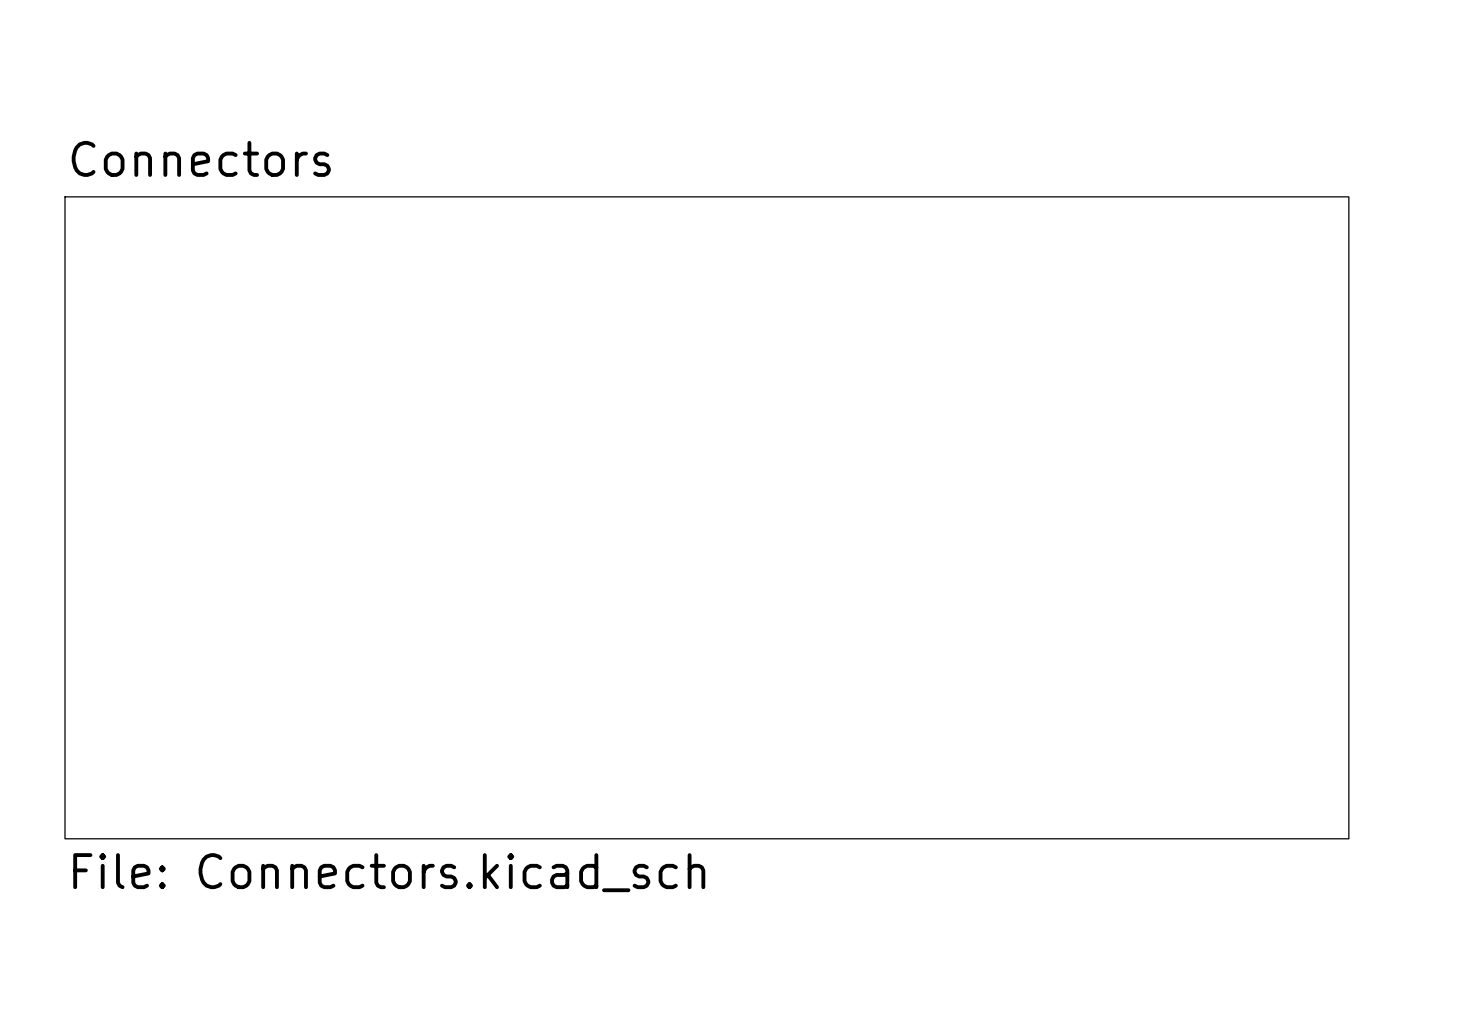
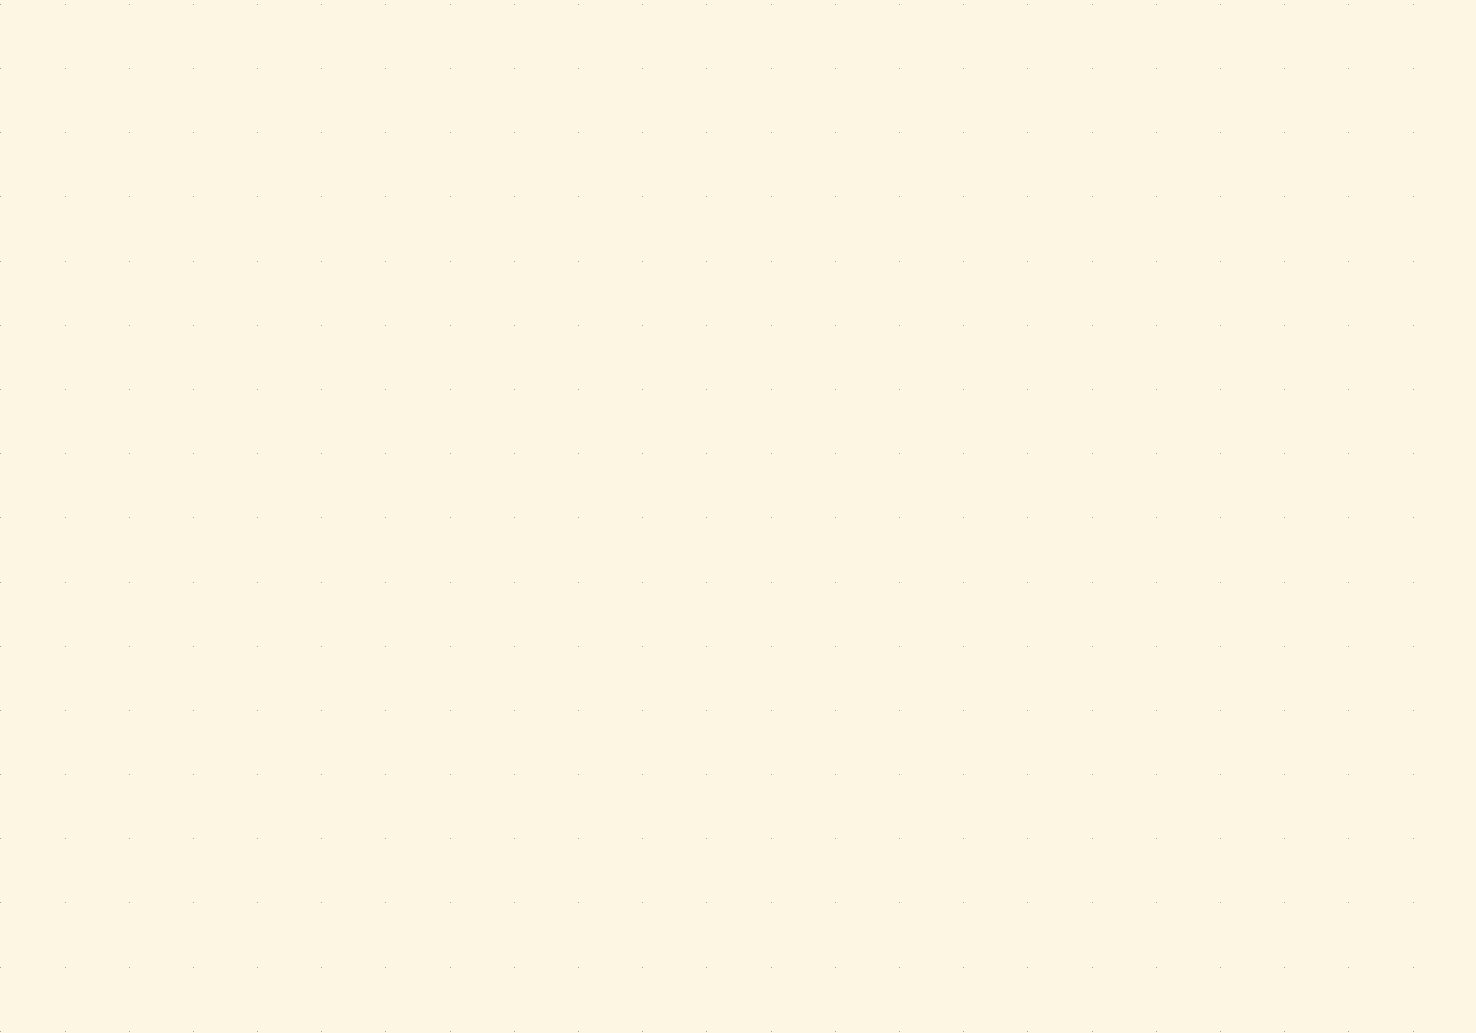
sheet Connectors: File: Connectors.kicad_sch (706, 517) -> none

